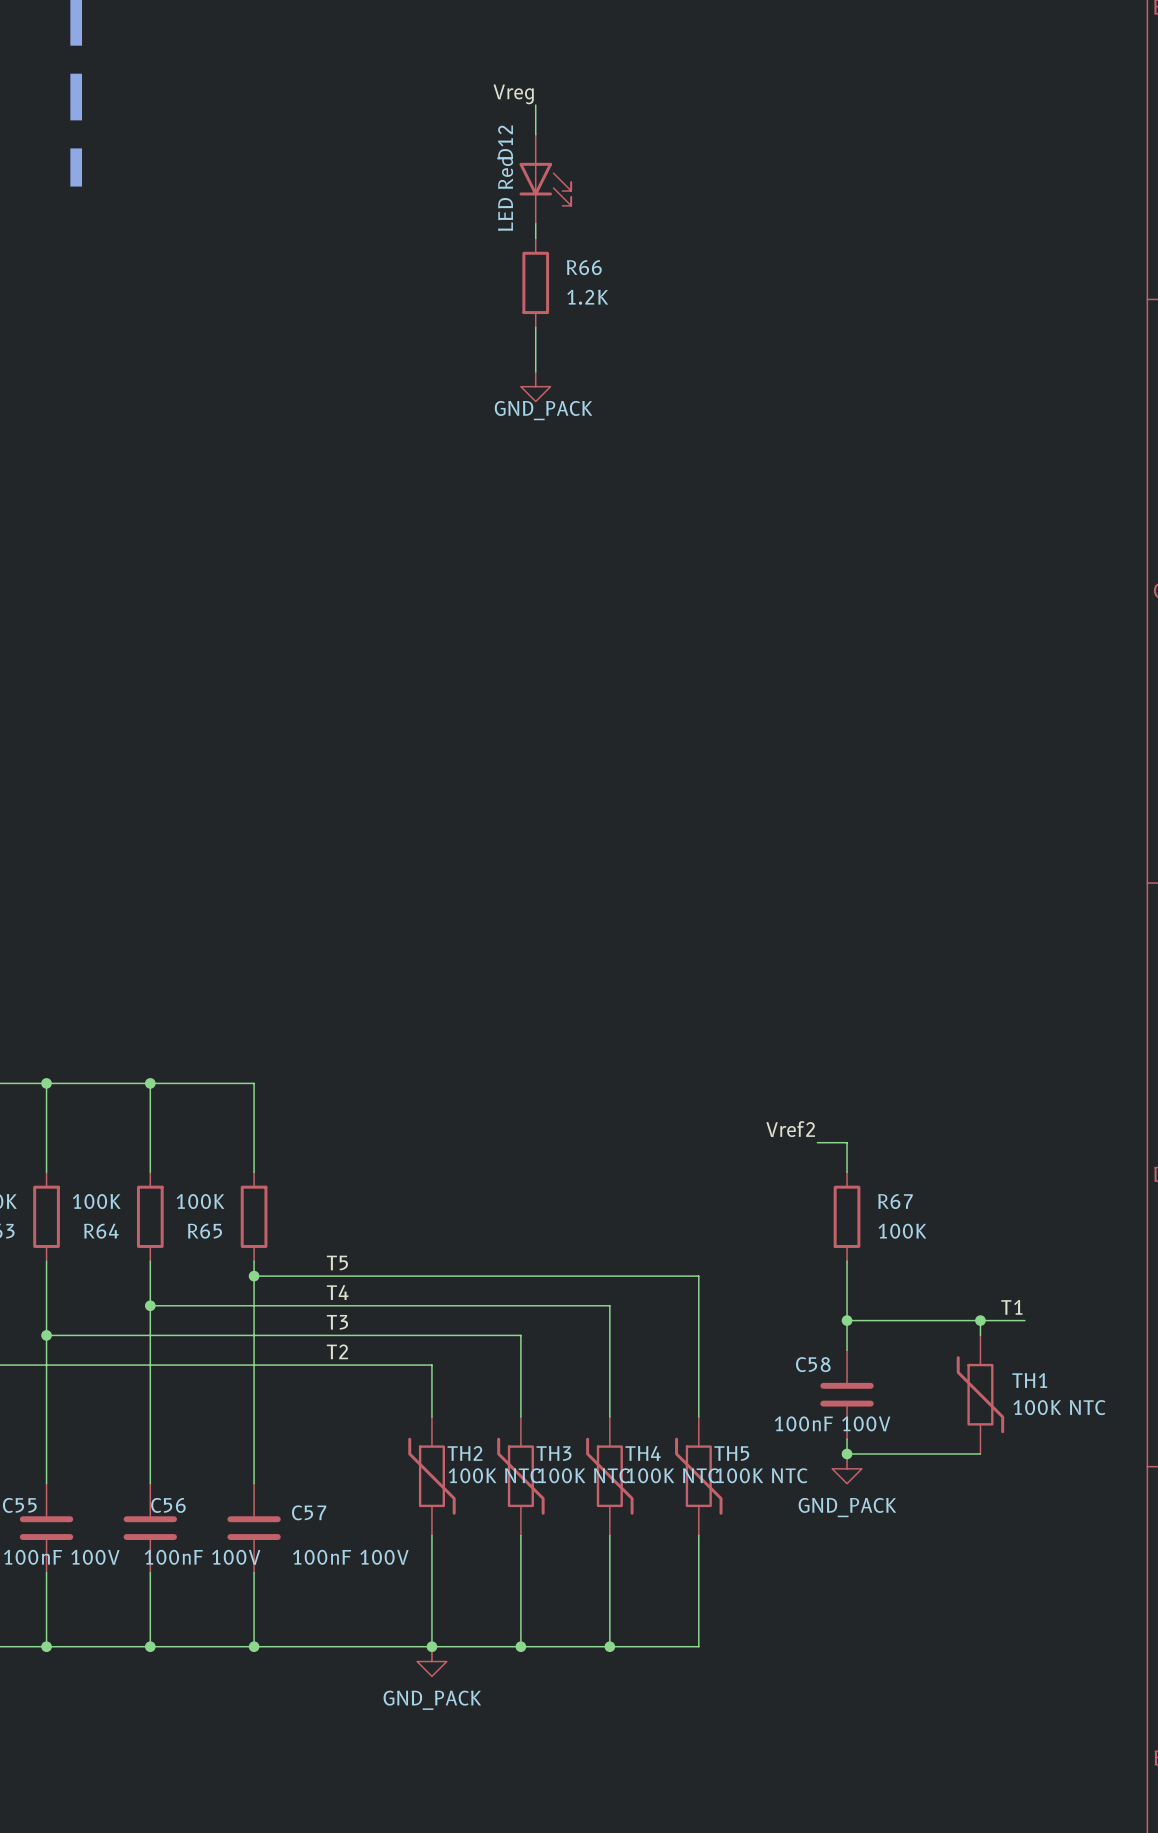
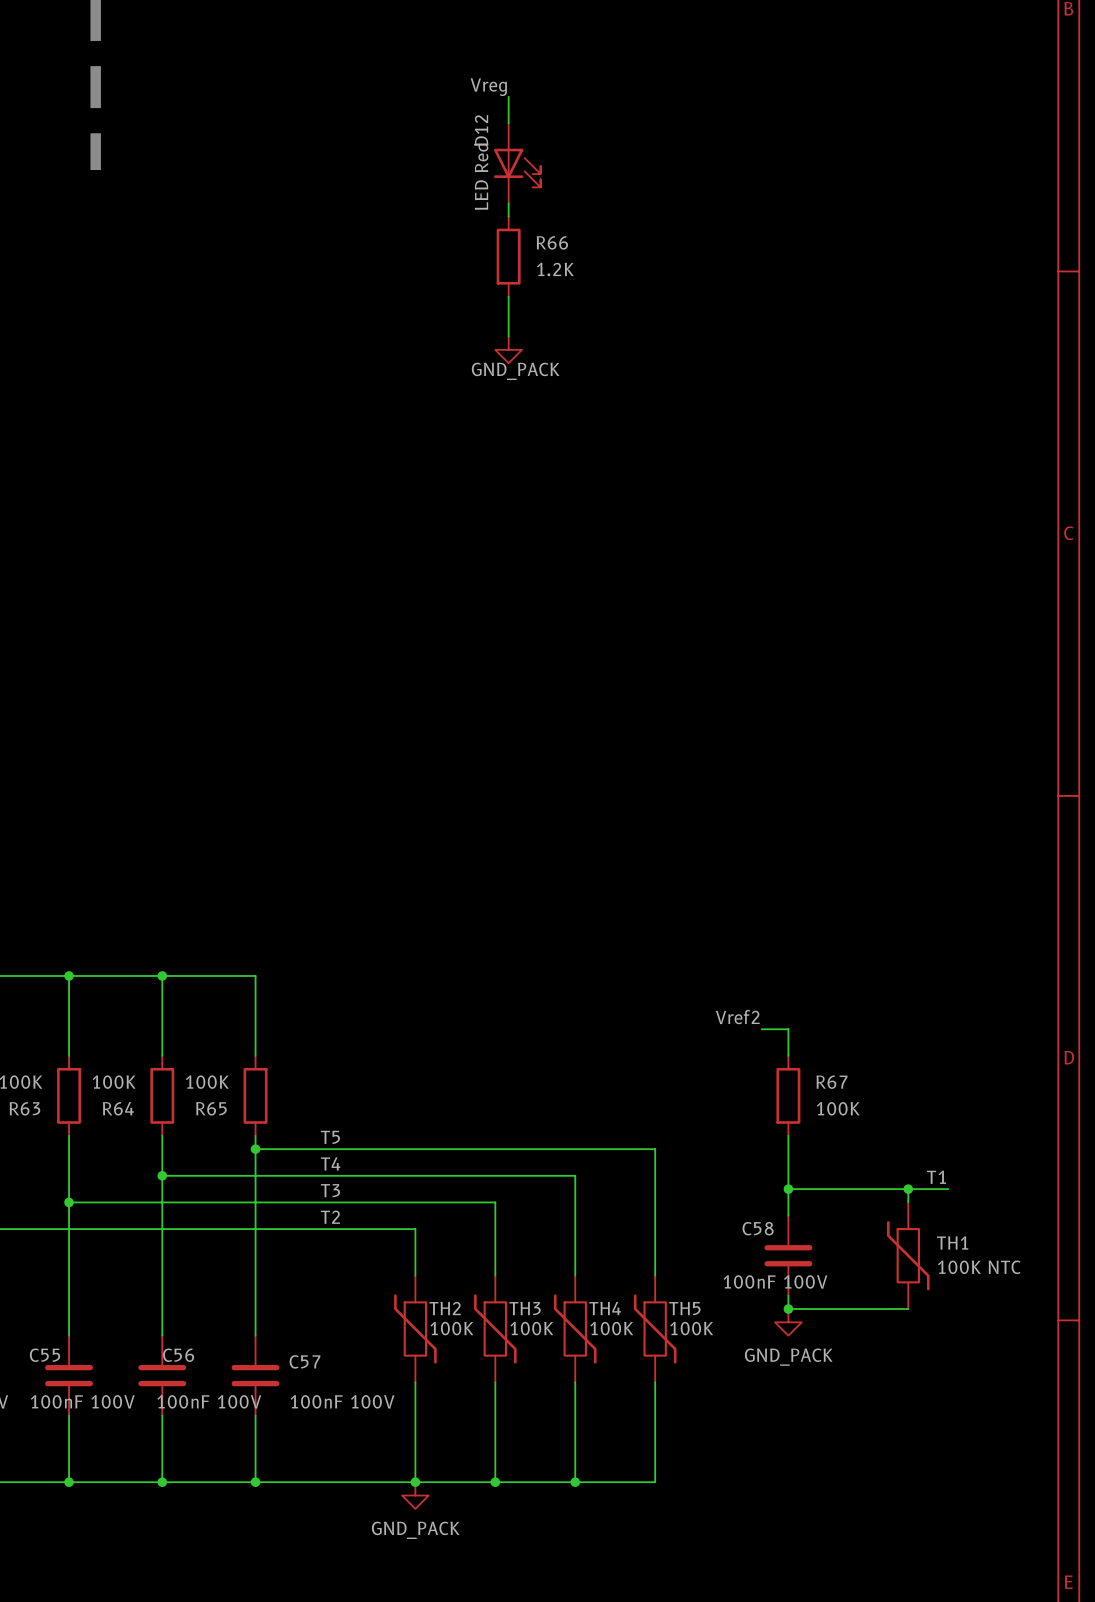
TH2 value: 100K NTC (494, 1475) -> 100K (451, 1328)
TH3 value: 100K NTC (583, 1475) -> 100K (531, 1328)
TH4 value: 100K NTC (672, 1475) -> 100K (611, 1328)
TH5 value: 100K NTC (761, 1475) -> 100K (691, 1328)

